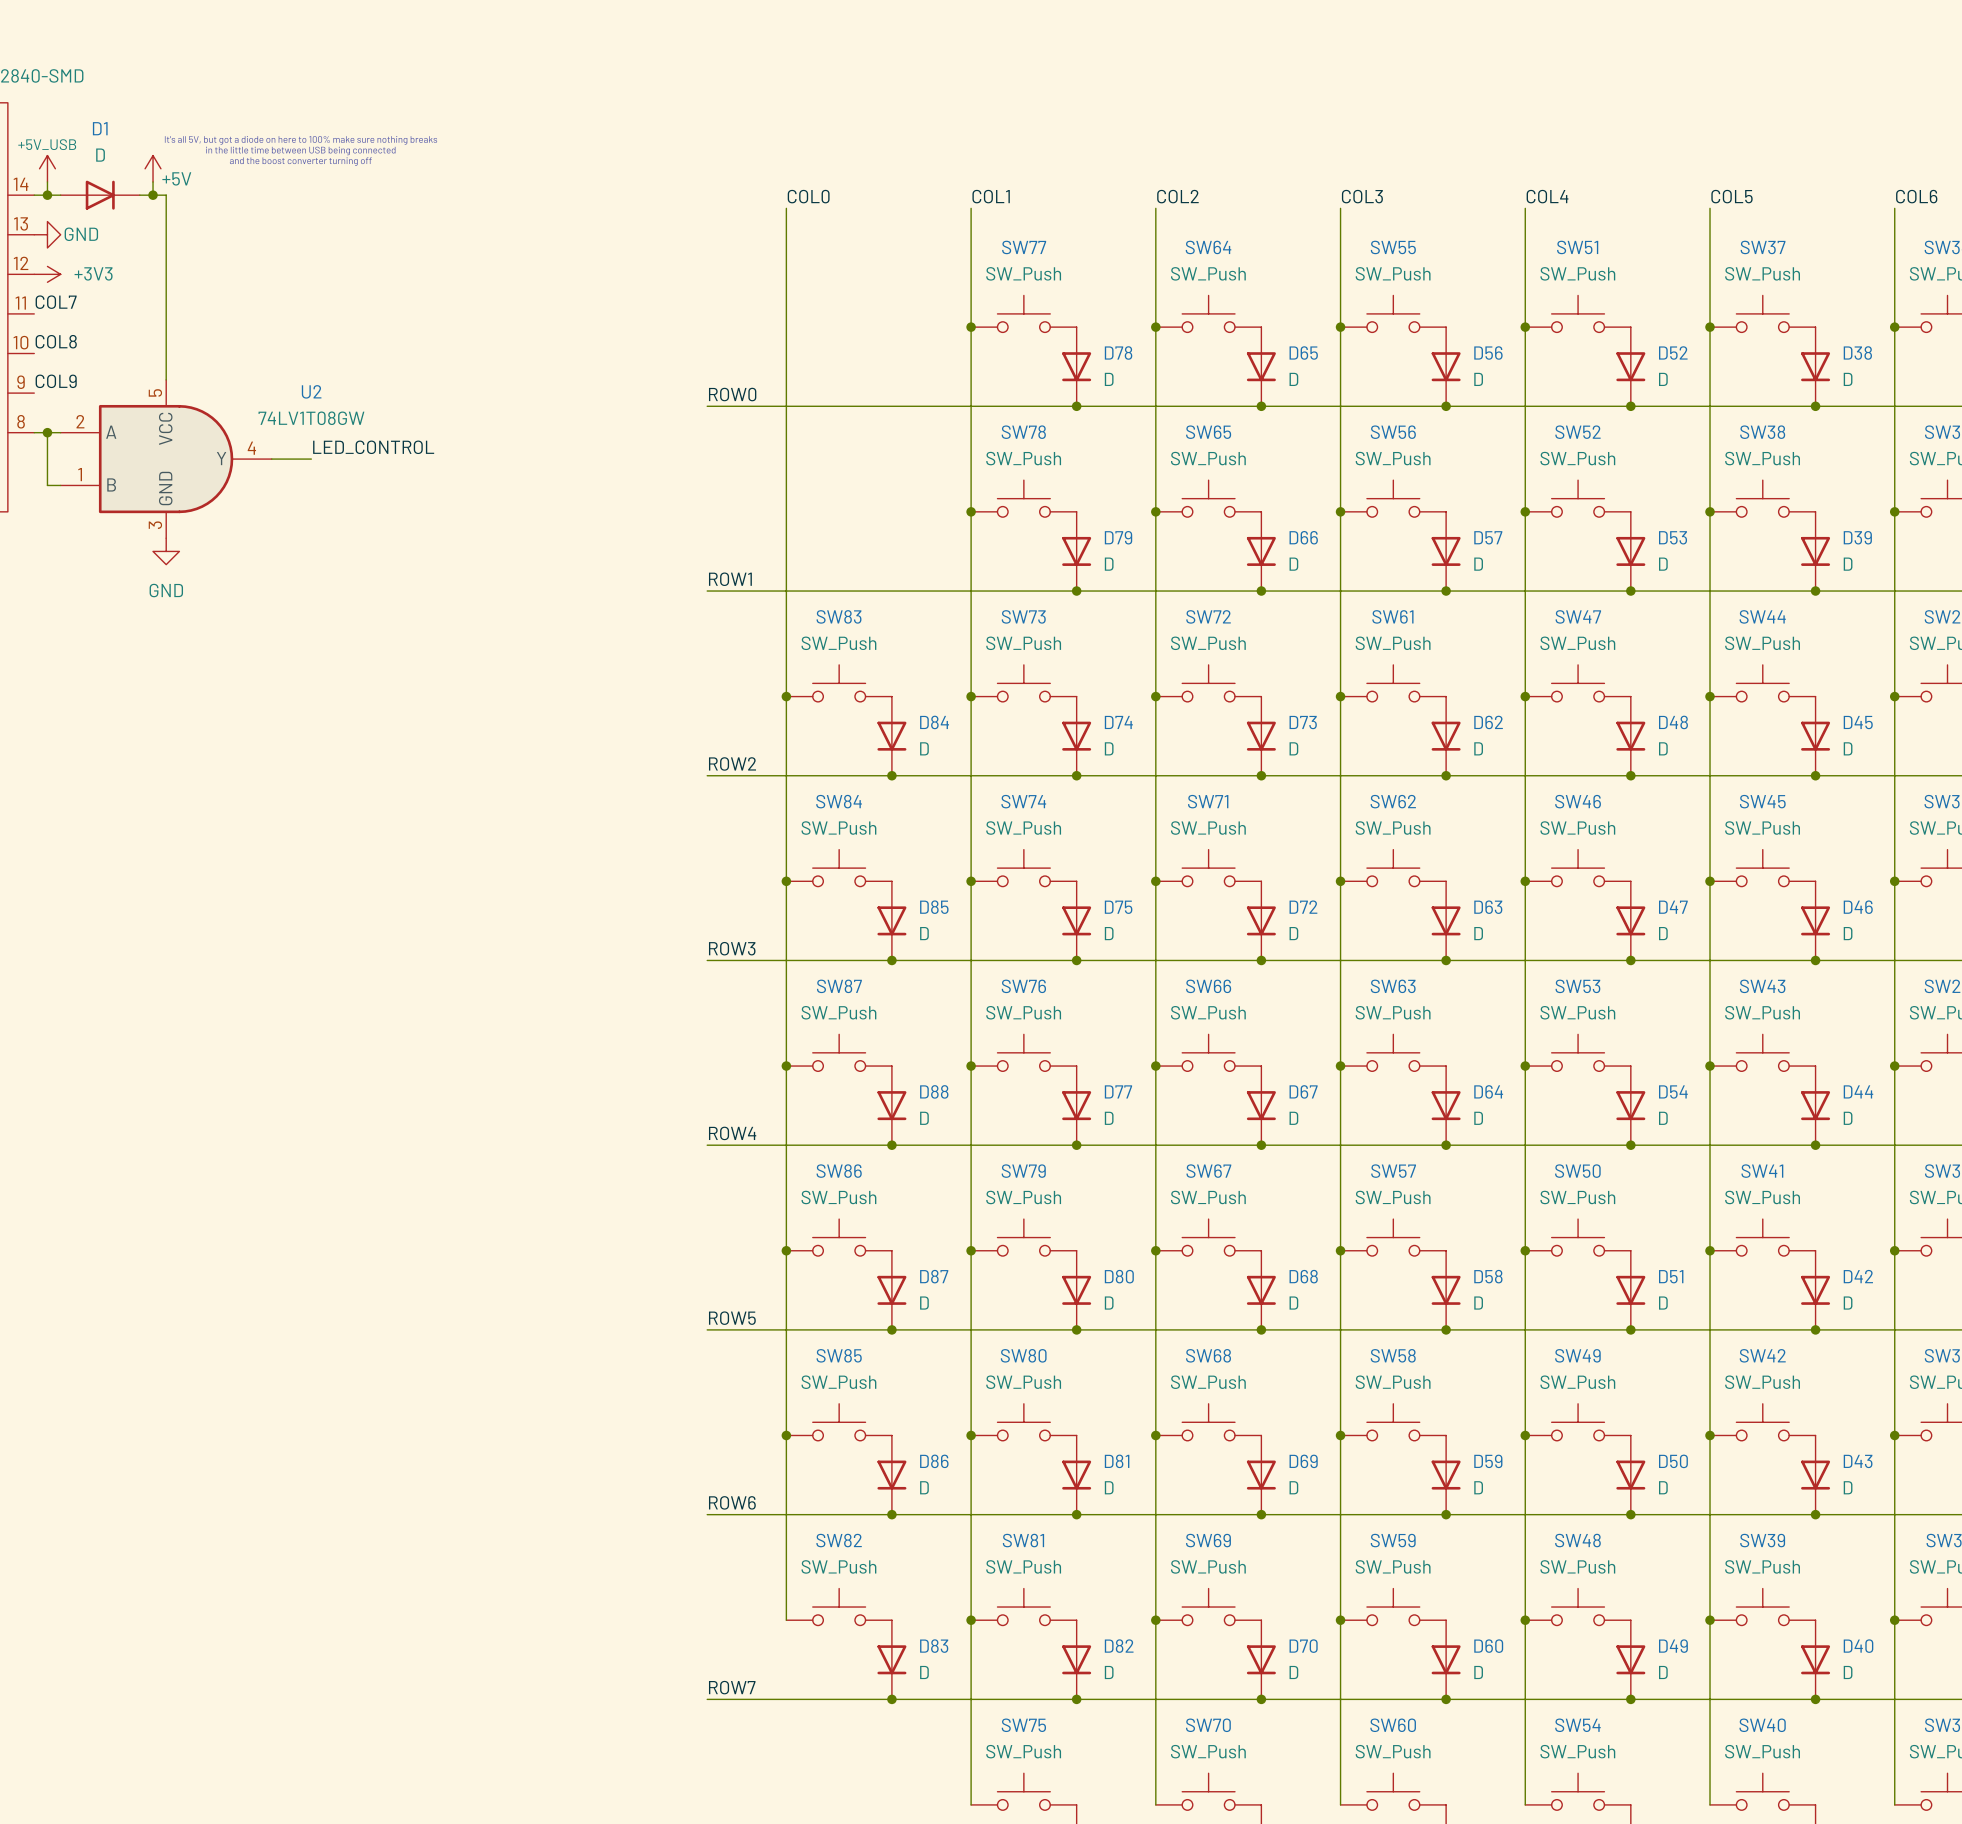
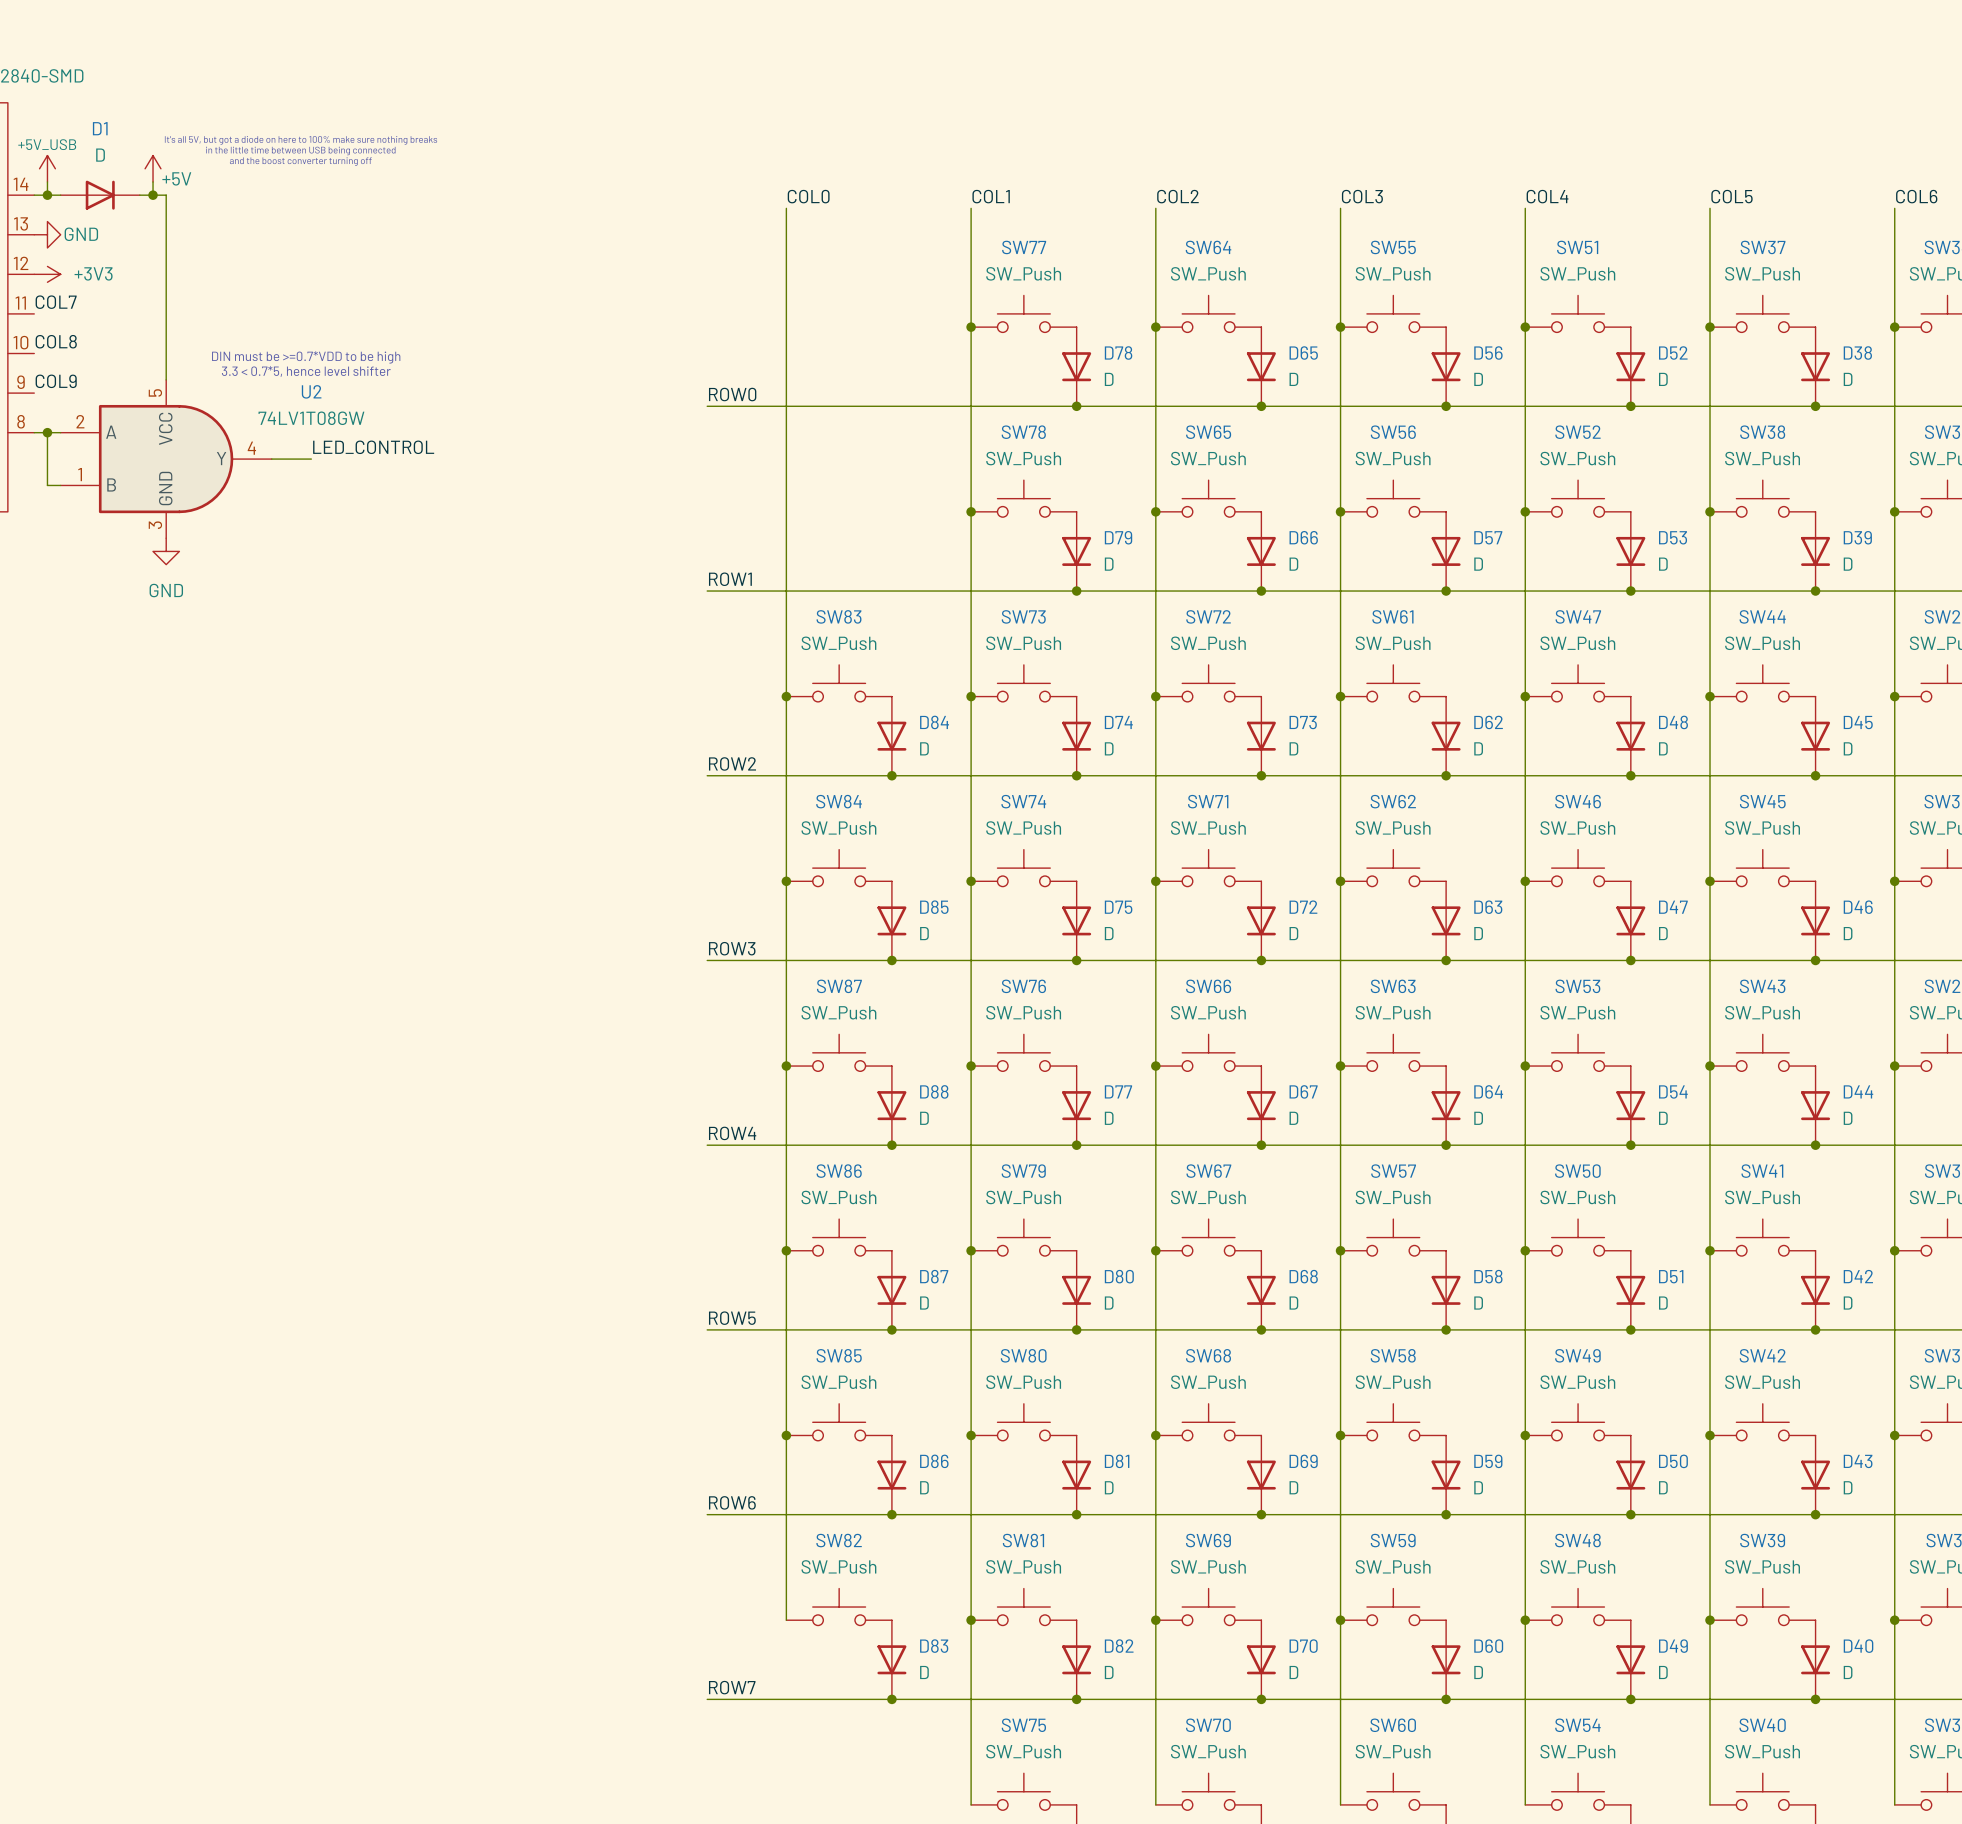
text: none -> DIN must be >=0.7*VDD to be high (306, 357)
text: none -> 3.3 < 0.7*5, hence level shifter (306, 371)

